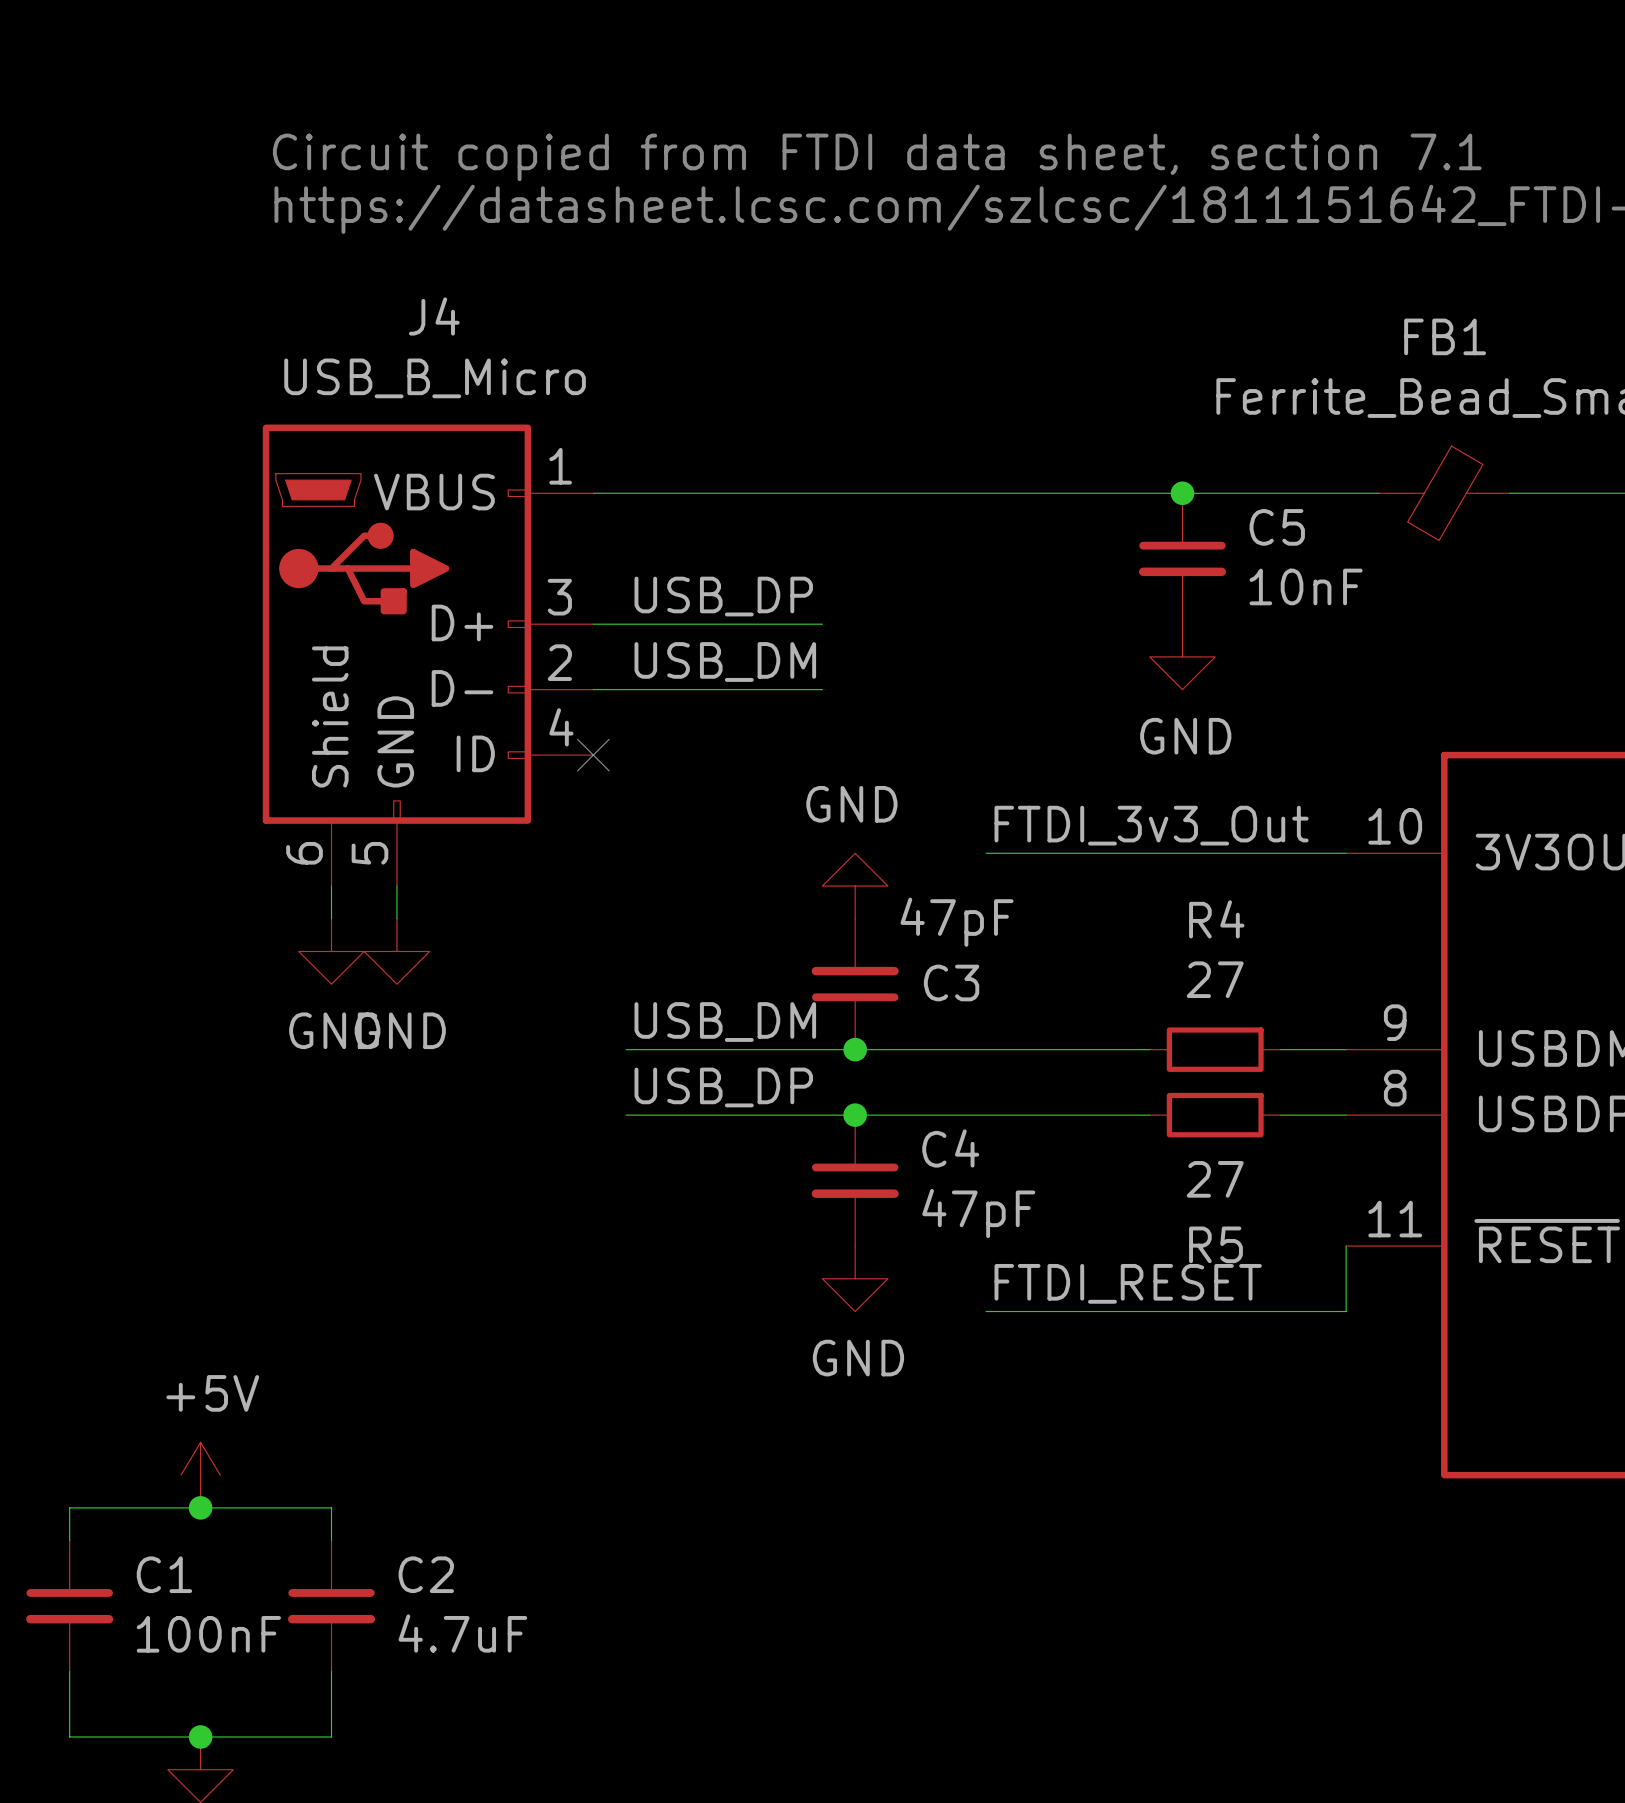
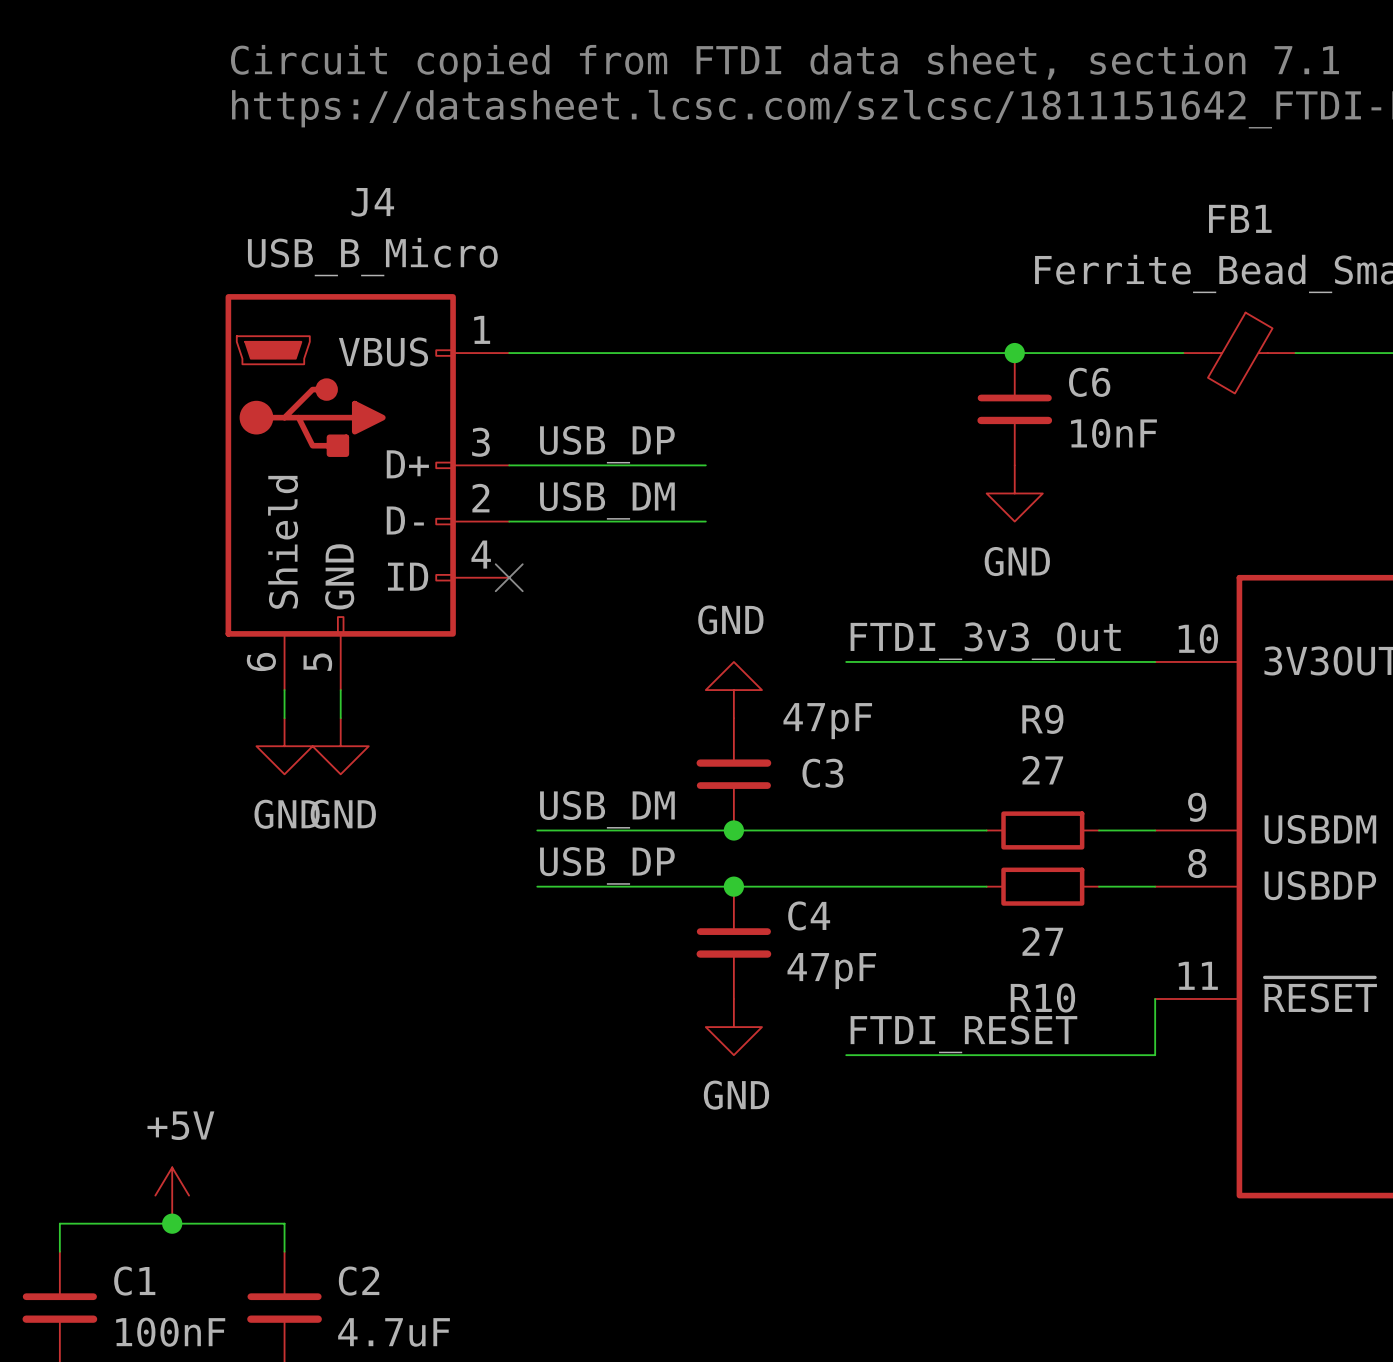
C5 name: C5 (1277, 527) -> C6 (1089, 382)
R4 name: R4 (1216, 919) -> R9 (1042, 719)
R5 name: R5 (1215, 1244) -> R10 (1042, 997)

